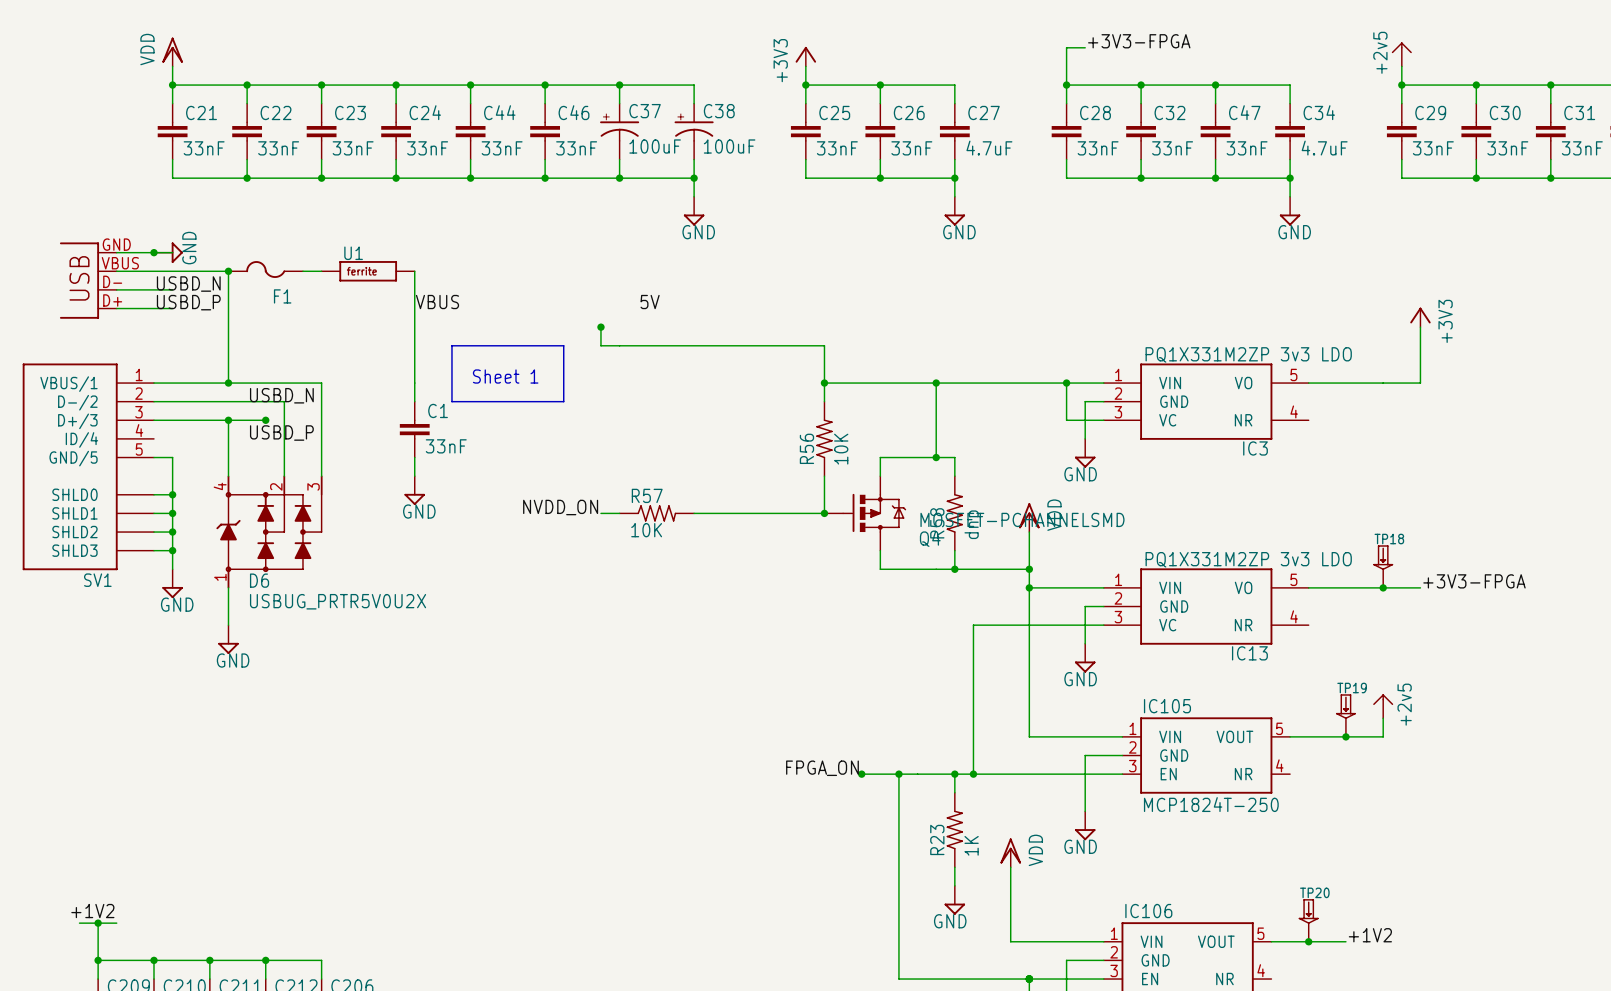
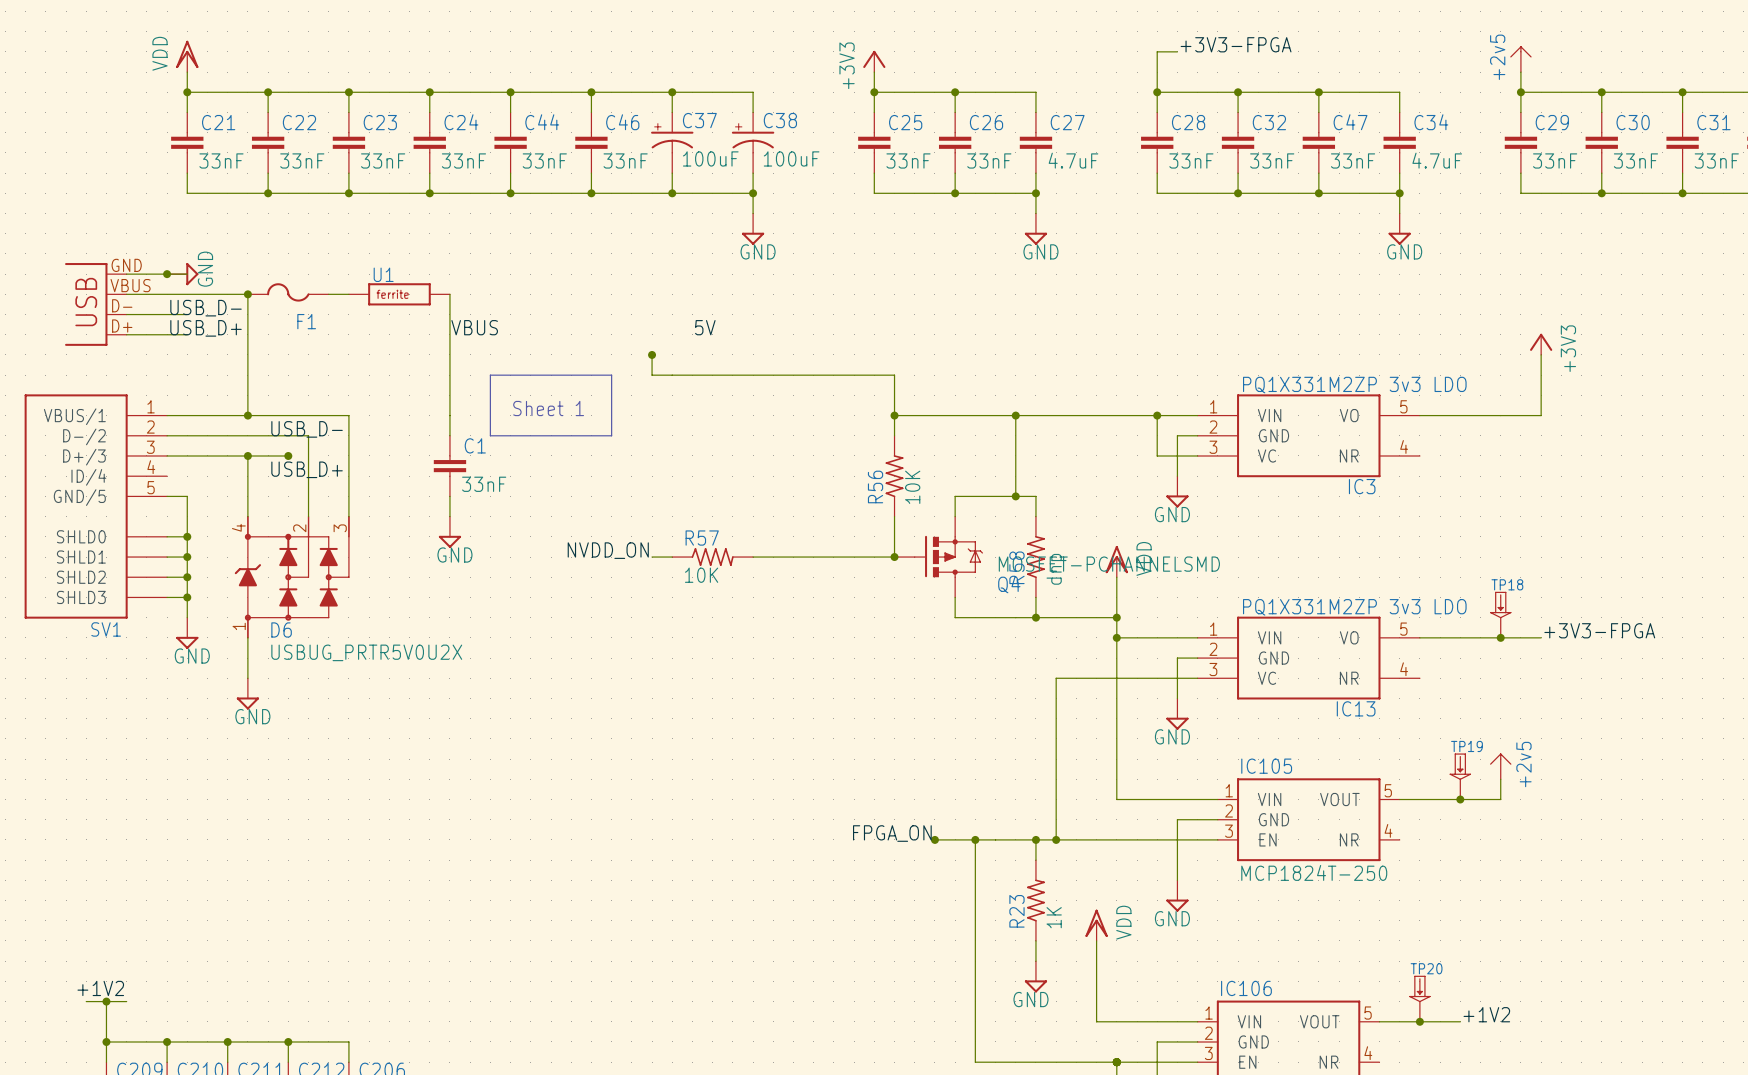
label: USBD_N (188, 284) -> USB_D- (206, 308)
label: USBD_P (188, 302) -> USB_D+ (206, 328)
label: USBD_N (281, 395) -> USB_D- (307, 429)
label: USBD_P (281, 433) -> USB_D+ (307, 469)

